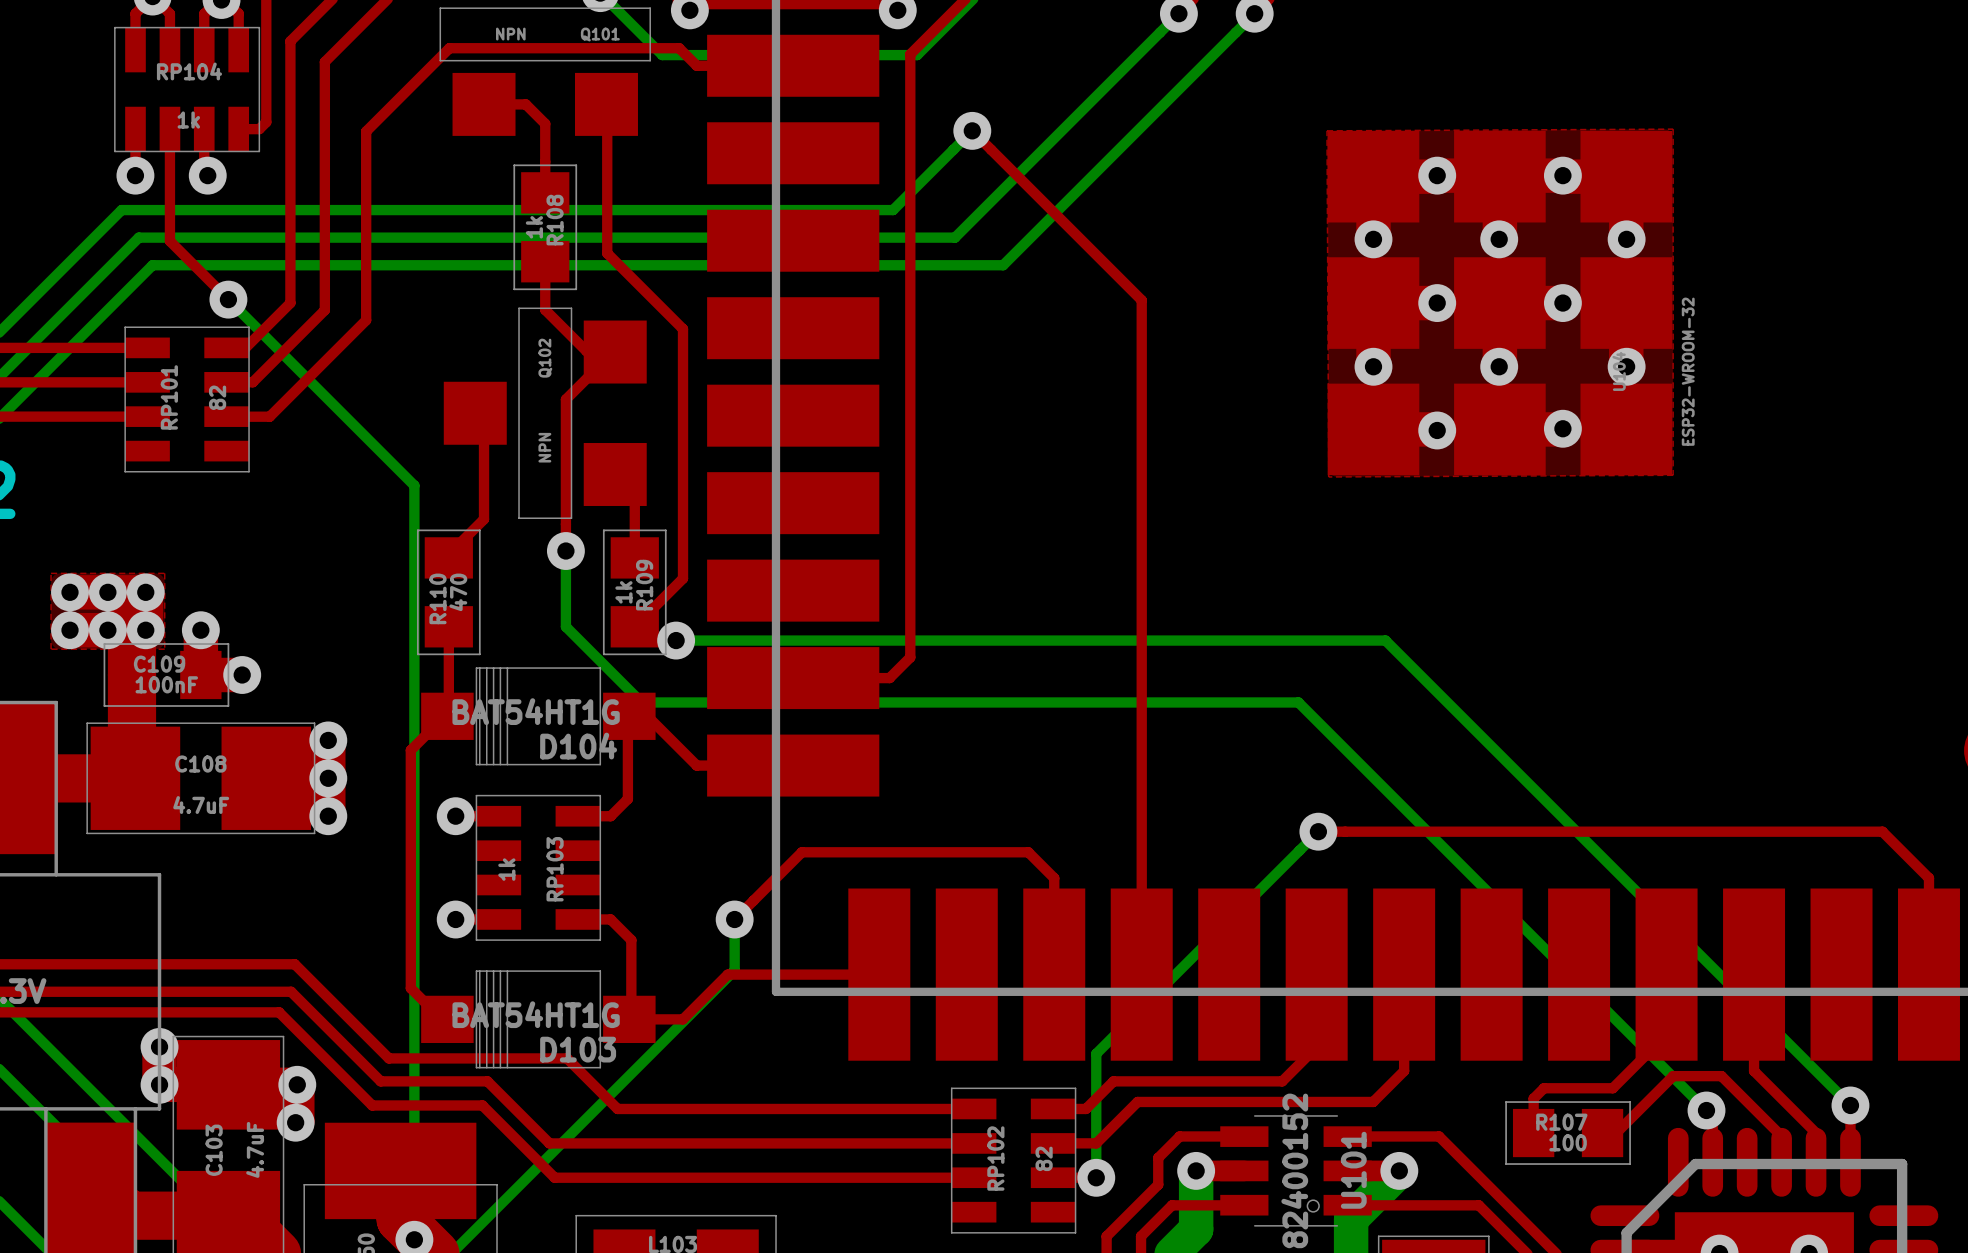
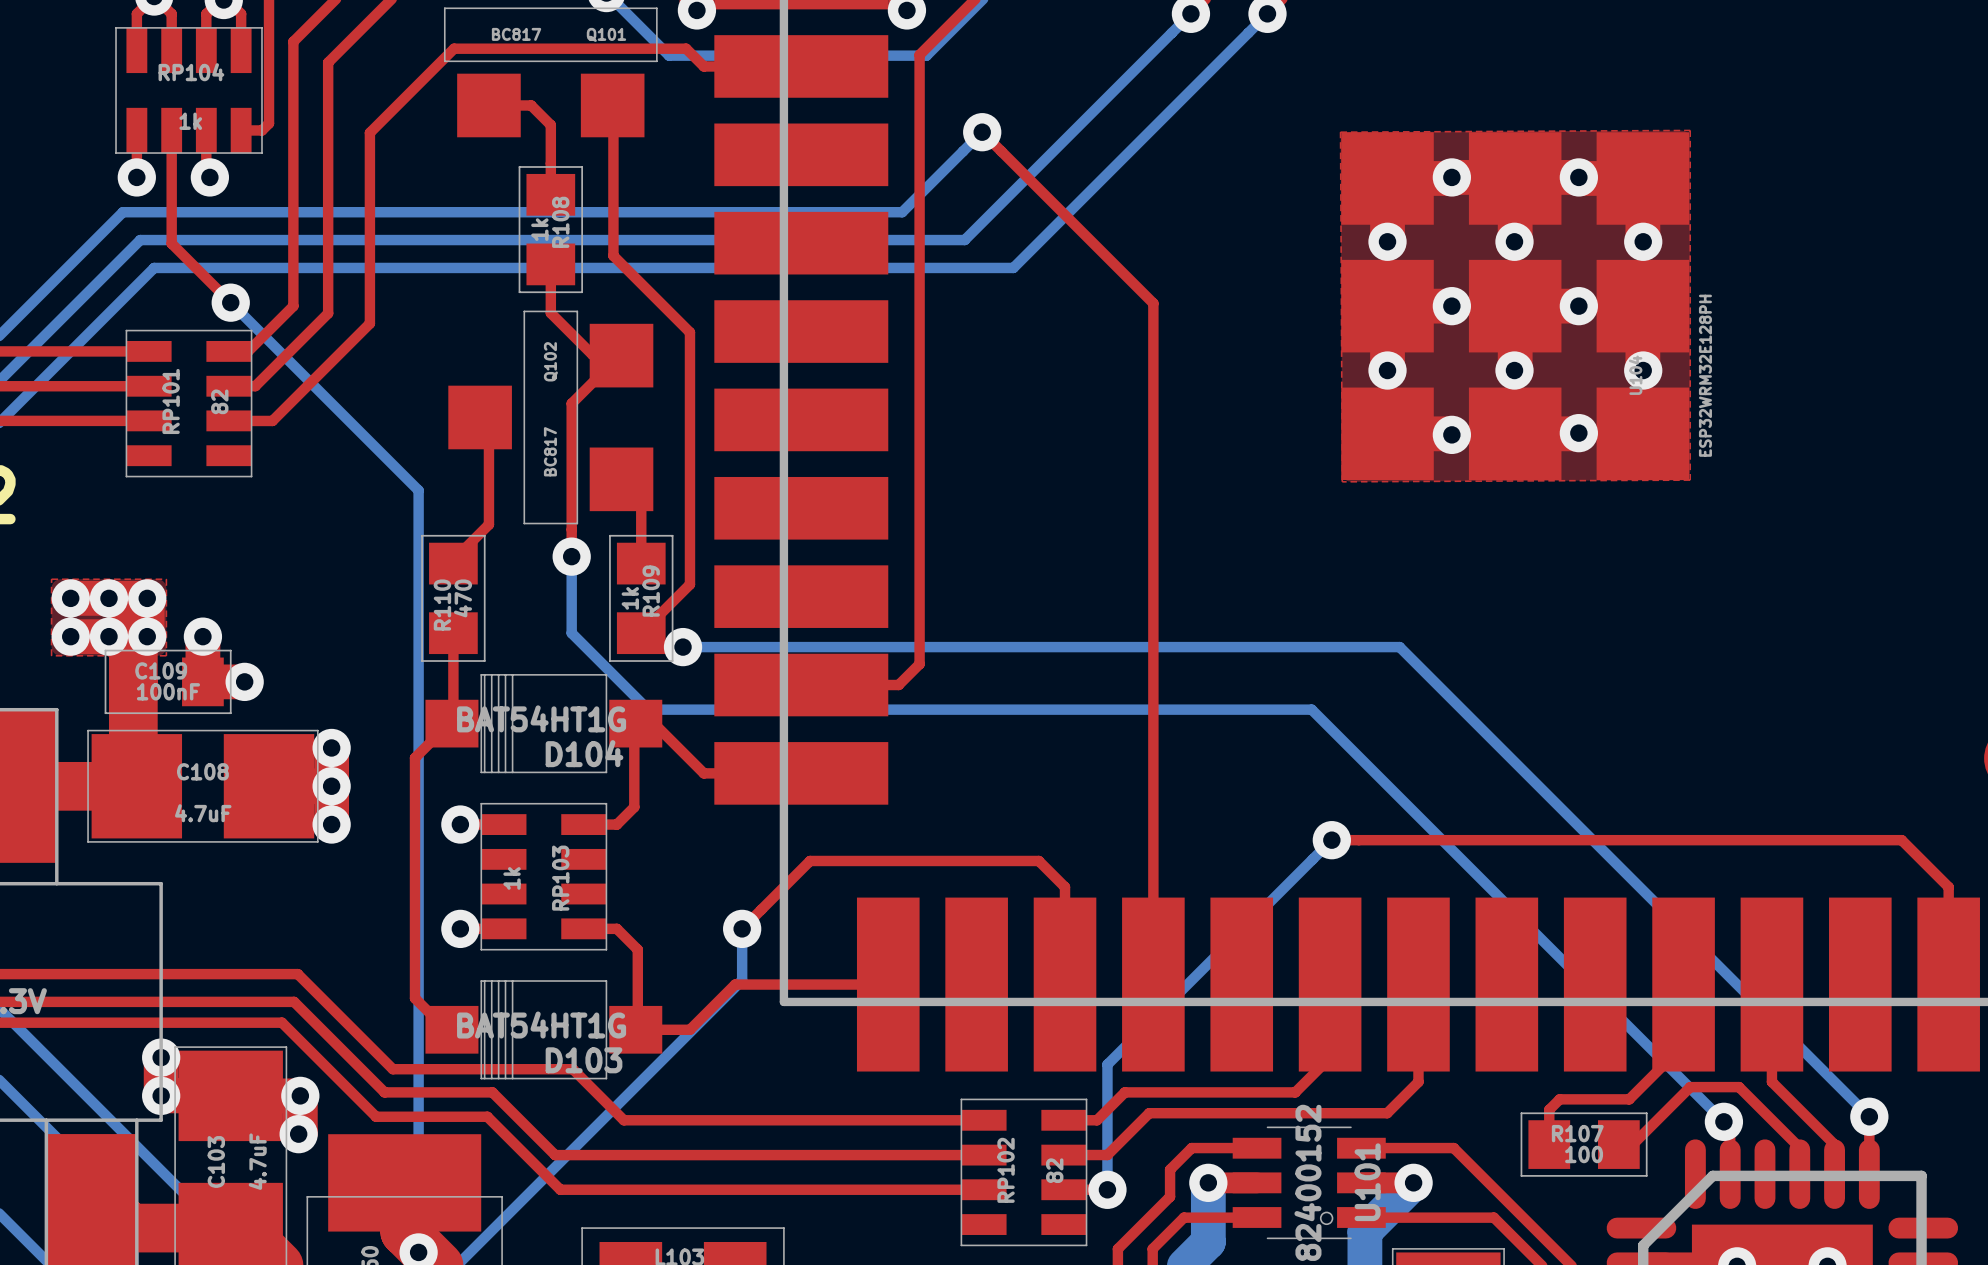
Q101 value: NPN (510, 34) -> BC817 (516, 34)
part value: ESP32-WROOM-32 (1688, 371) -> ESP32WRM32E128PH (1705, 375)
Q102 value: NPN (544, 447) -> BC817 (550, 451)

